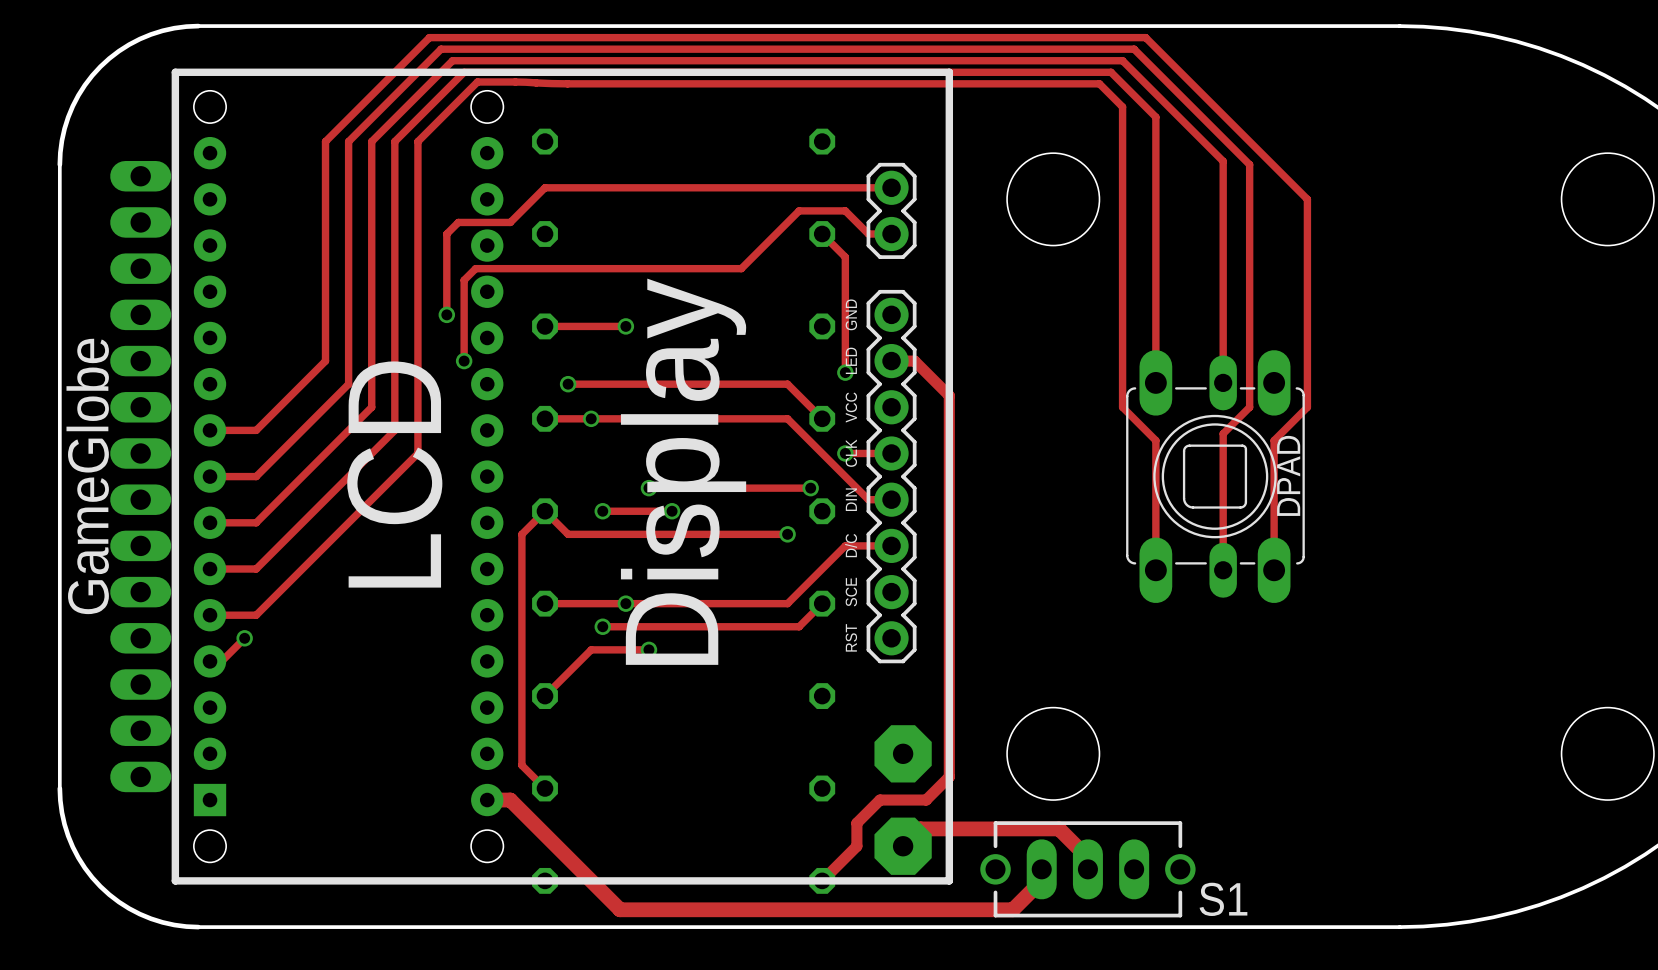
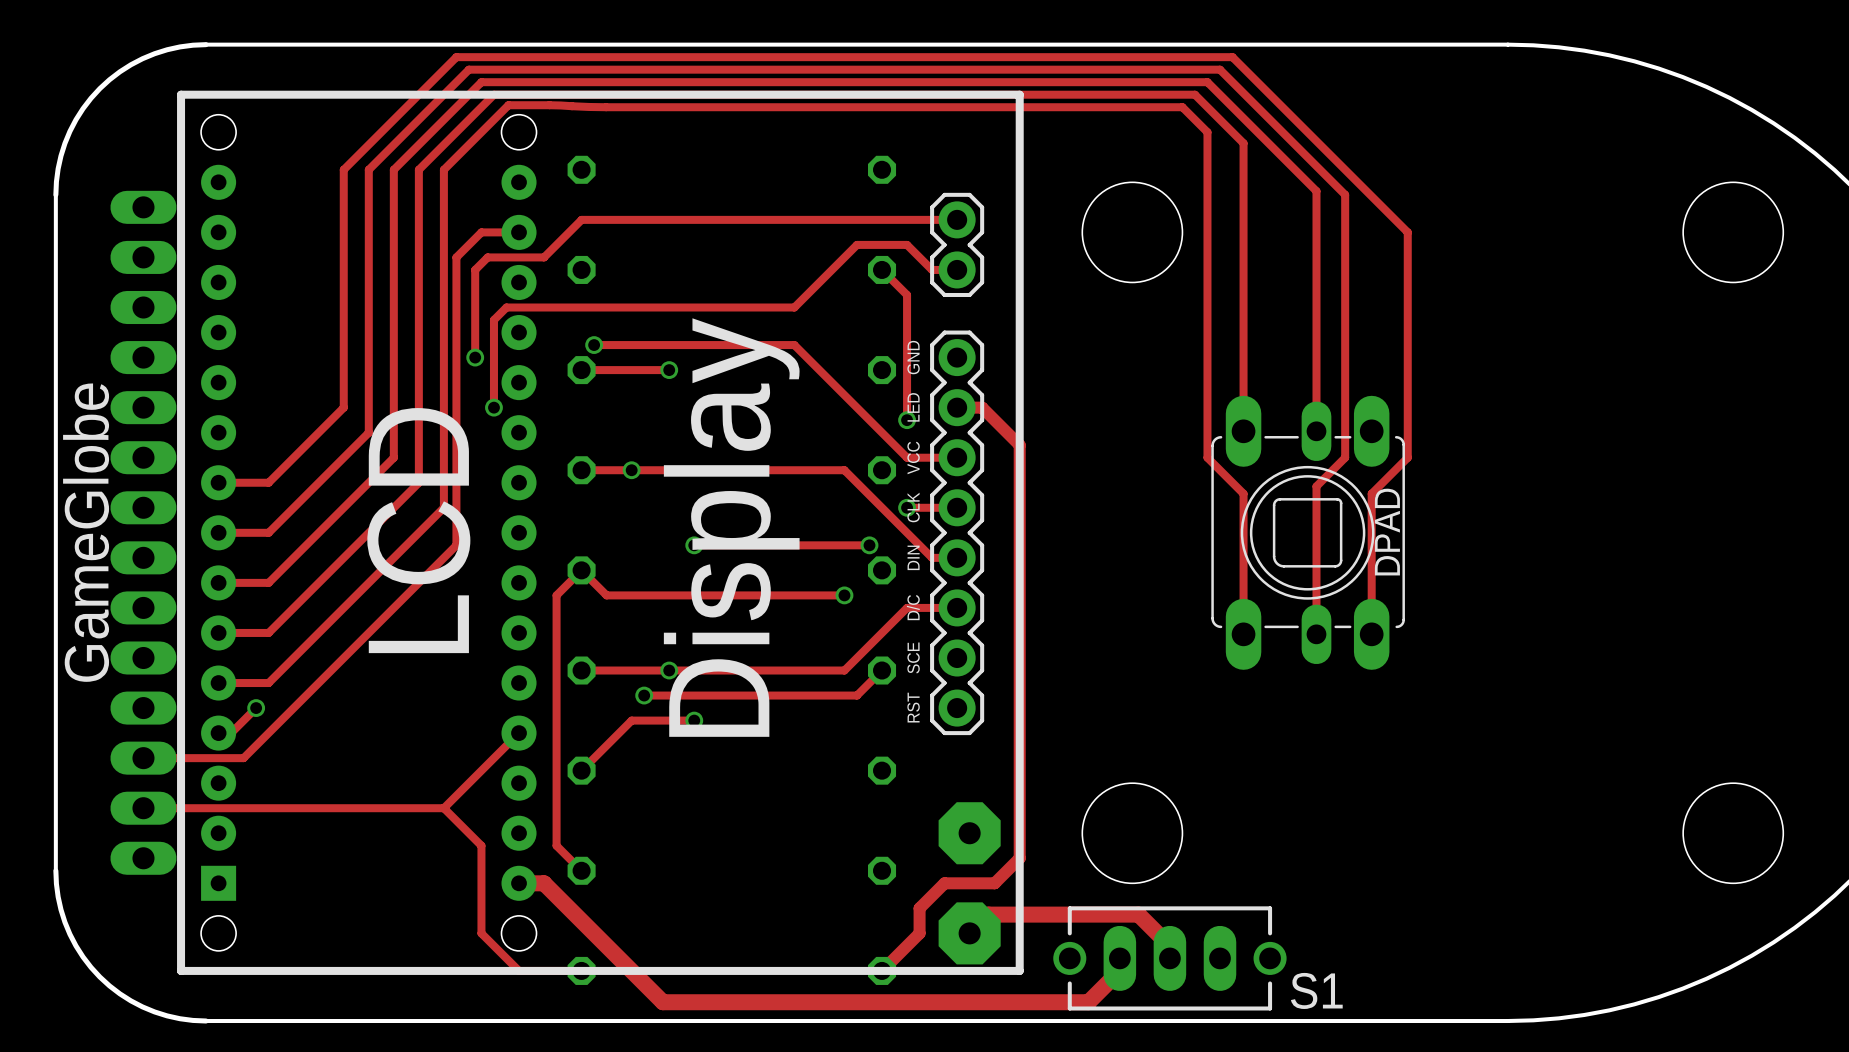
track: none -> (519, 232) (481, 232) (456, 257) (456, 545) (243, 758) (143, 758)
track: none -> (594, 345) (794, 345) (907, 457) (957, 457)
track: (568, 384) (787, 384) (822, 418) -> none
via position: (568, 384) -> (594, 345)
track: (602, 511) (672, 511) -> none
via: (602, 511) -> none
via: (672, 511) -> none
track: none -> (519, 733) (443, 808)
track: none -> (143, 808) (443, 808)
track: none -> (443, 808) (481, 845) (481, 933) (519, 970) (581, 970)

